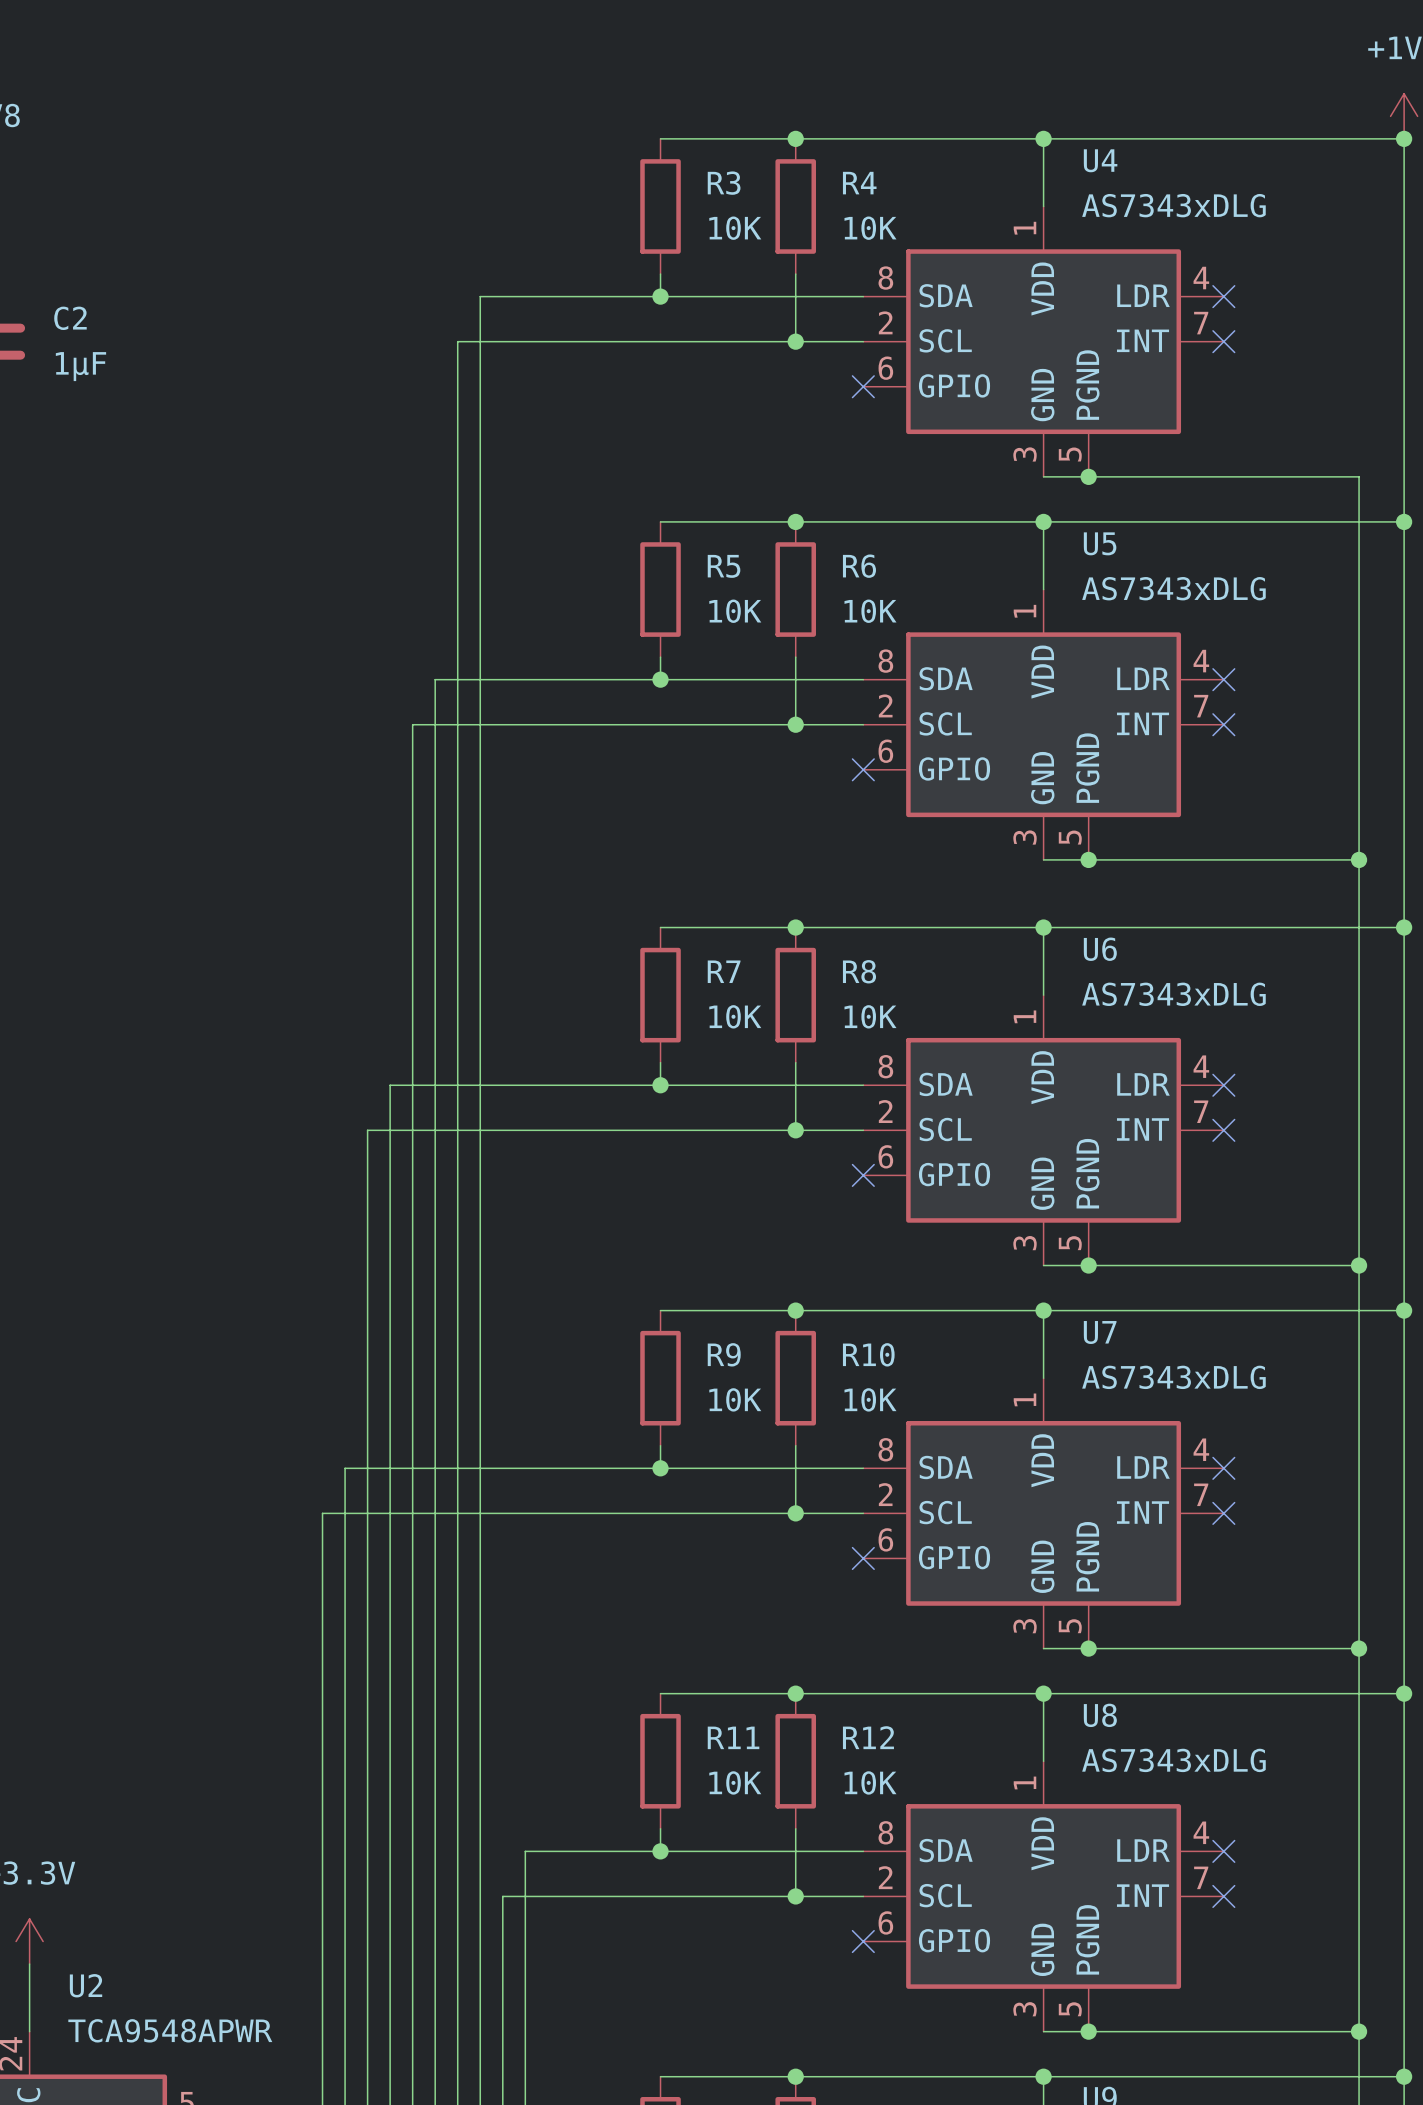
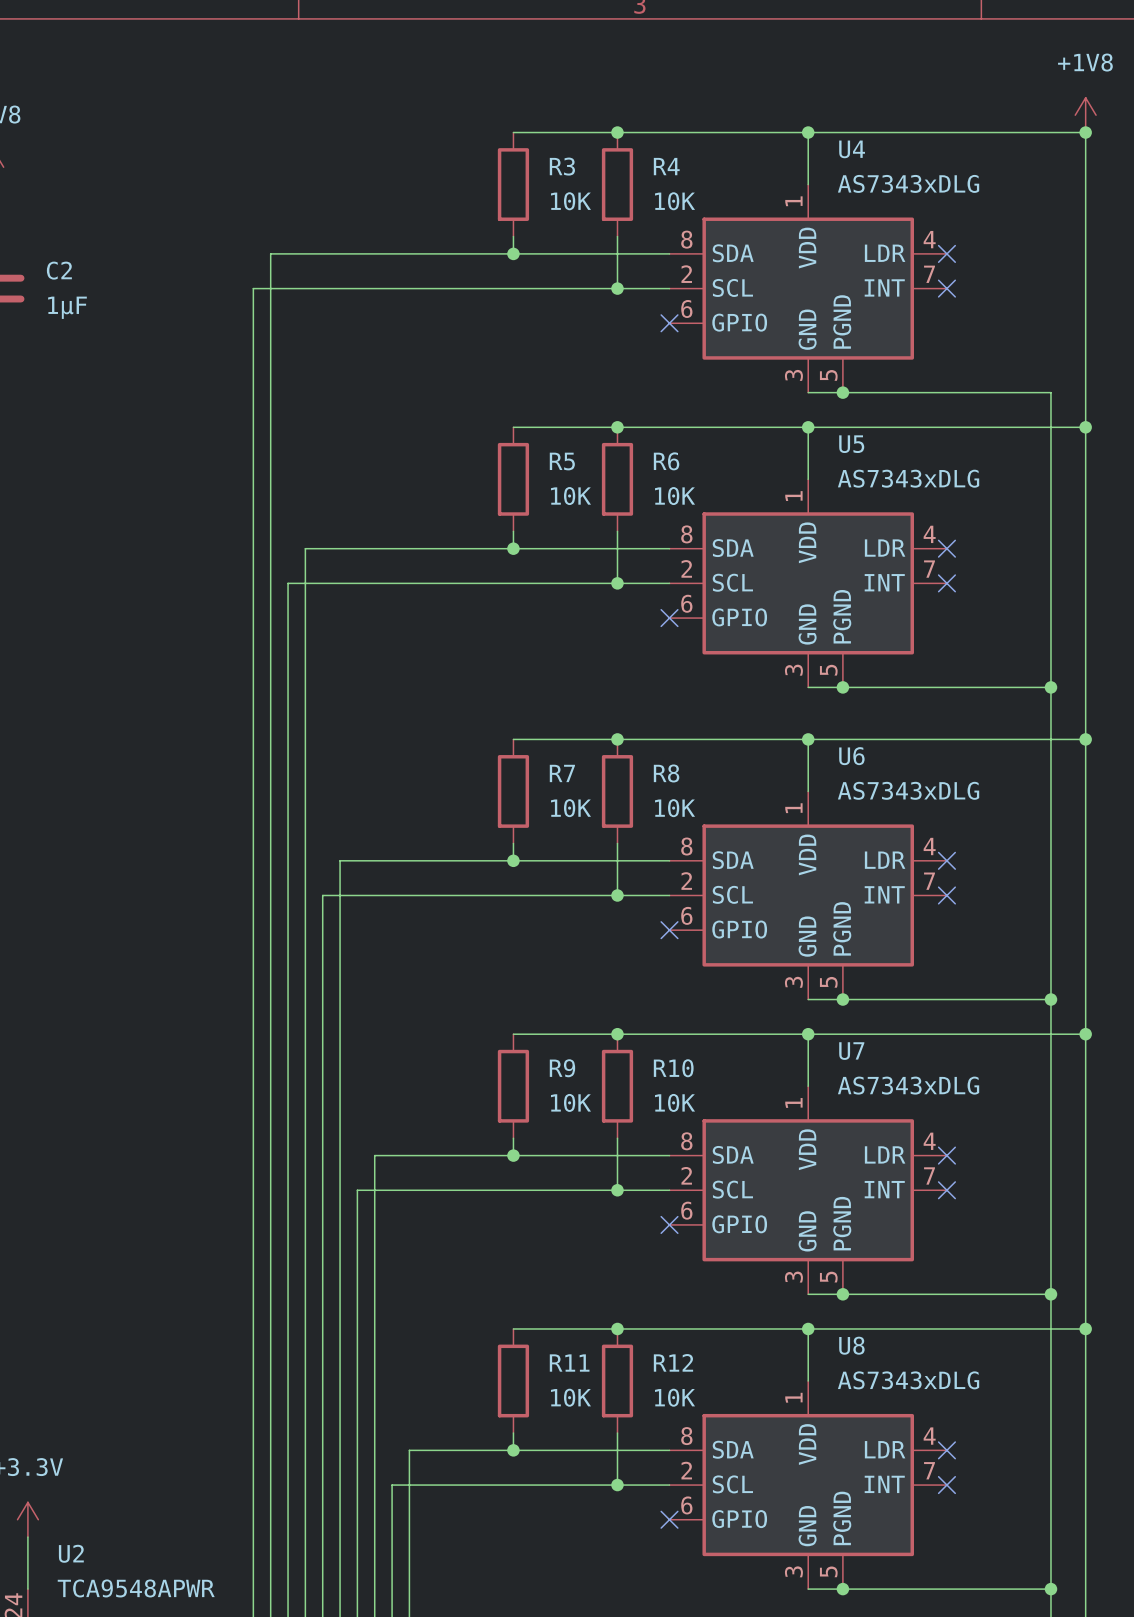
wire: (480, 296) (480, 1468) (345, 1468) -> (374, 253) (270, 253) (270, 1155)
wire: (457, 341) (457, 1513) (322, 1513) -> (357, 288) (253, 288) (253, 1190)
wire: (435, 679) (435, 1085) (390, 1085) -> (340, 548) (305, 548) (305, 860)
wire: (412, 724) (412, 1130) (367, 1130) -> (322, 583) (288, 583) (288, 895)

